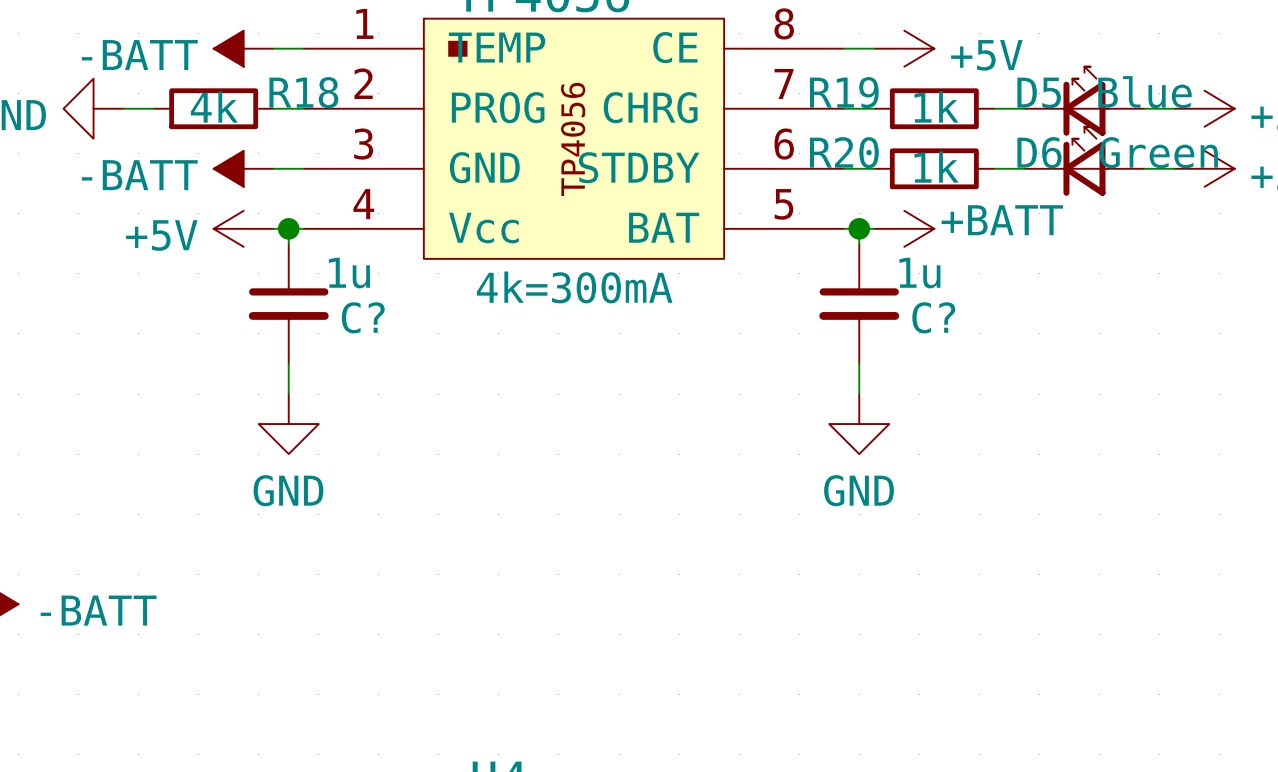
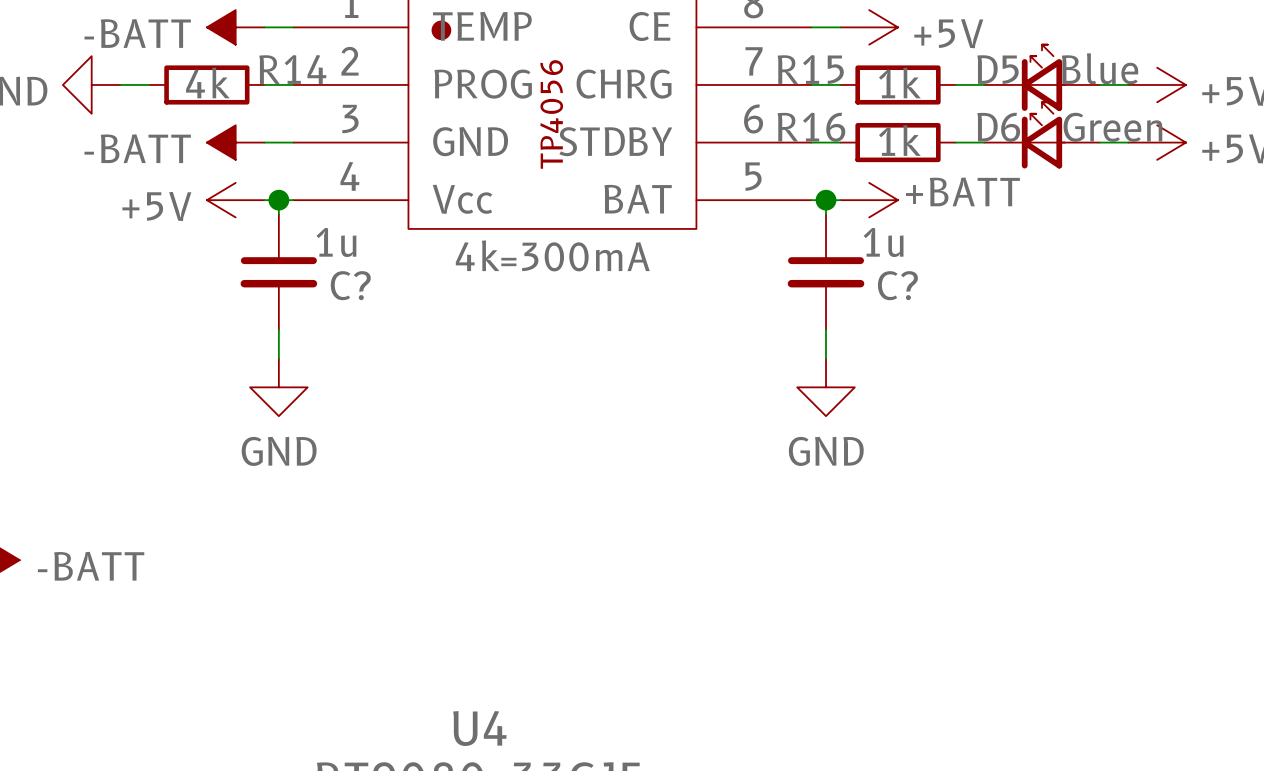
R18 name: R18 (303, 92) -> R14 (292, 69)
R19 name: R19 (844, 92) -> R15 (810, 69)
R20 name: R20 (844, 152) -> R16 (811, 127)

